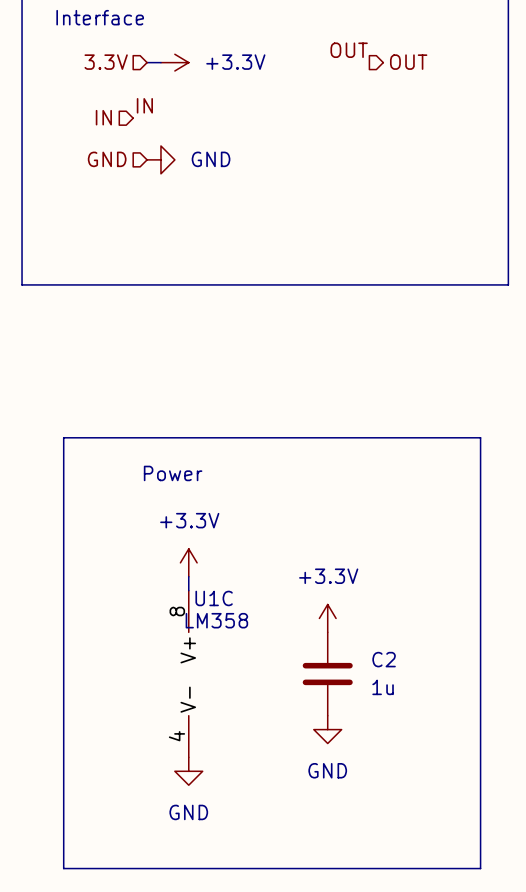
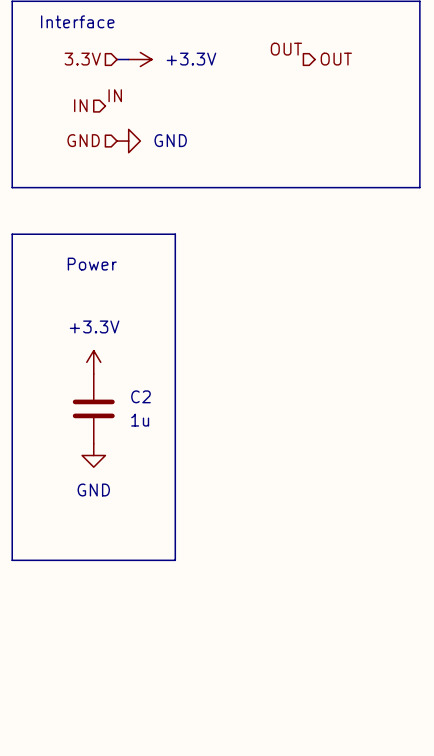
line: (22, 215) (22, 271) -> (12, 245) (12, 560) (175, 560) (175, 234) (12, 234)
line: (508, 215) (508, 284) (22, 284) -> (419, 187) (12, 187)
power symbol: none -> +3.3V (93, 362)
line: (63, 437) (480, 437) (480, 868) (63, 868) (63, 437) -> none
text position: Power (173, 473) -> Power (92, 264)
power symbol: none -> GND (93, 455)
power symbol: +3.3V (188, 562) -> none
wire: (188, 576) (188, 590) -> none
power symbol: +3.3V (327, 618) -> none
U1C: LM358 (188, 674) -> none
C2 position: (327, 674) -> (93, 408)
power symbol: GND (327, 729) -> none
power symbol: GND (188, 771) -> none

